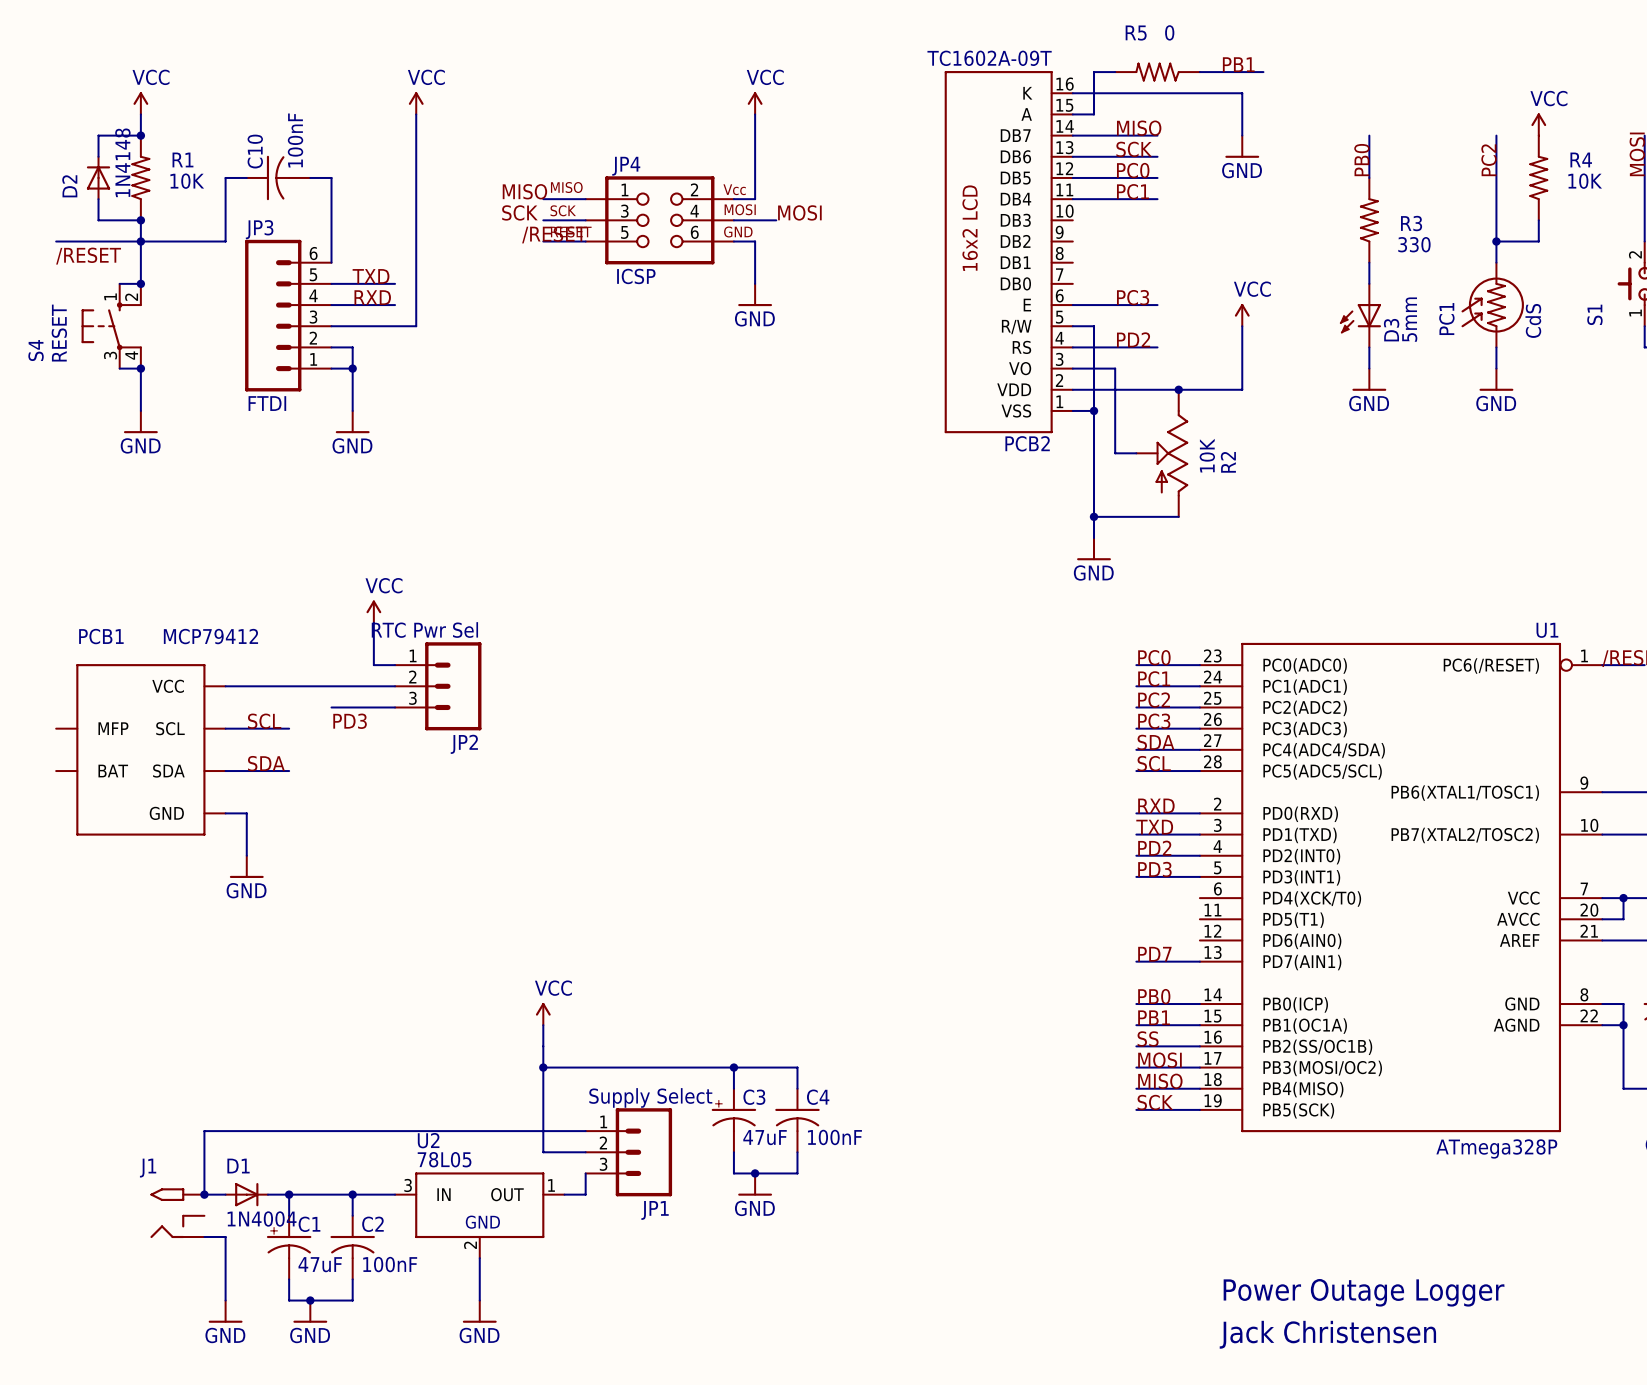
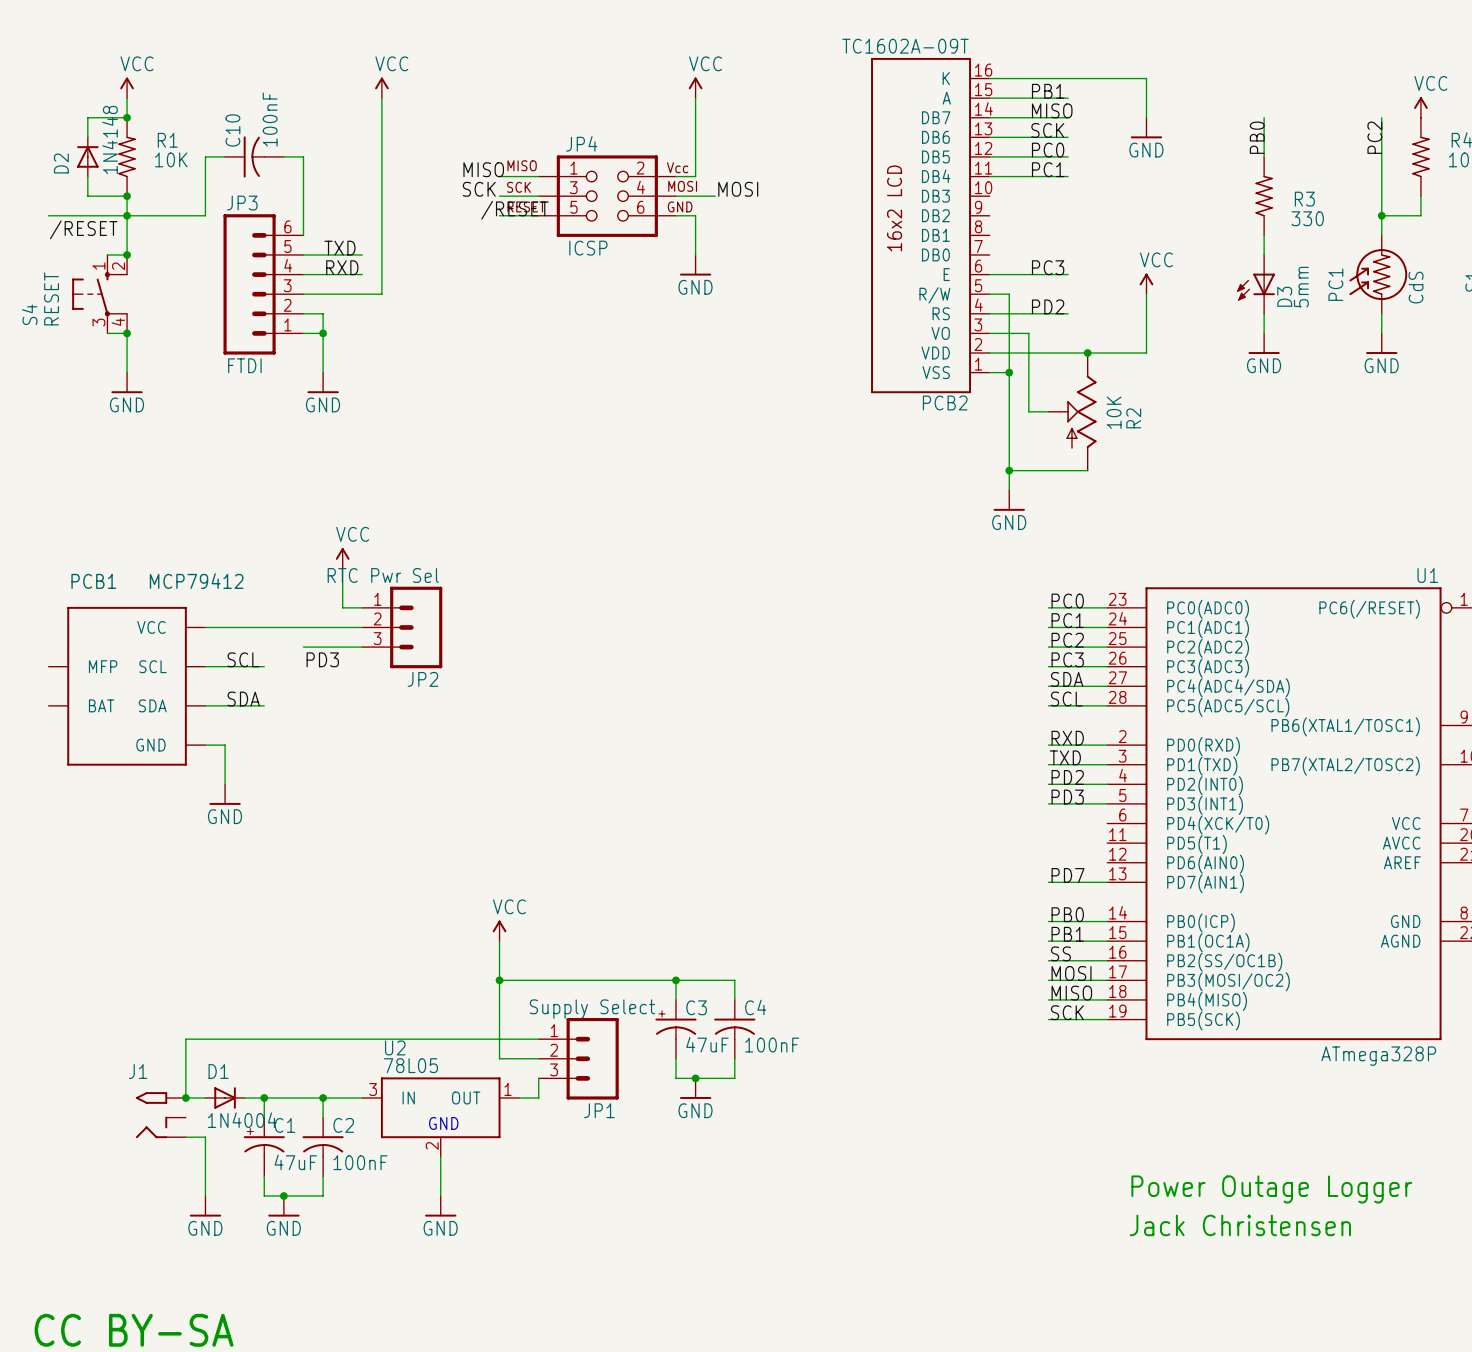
label position: PB1 (1238, 64) -> PB1 (1048, 91)
wire: (1115, 72) (1094, 72) (1094, 114) -> (1068, 98) (1009, 98)
R5: 0 (1157, 72) -> none
wire: (1199, 72) (1263, 72) -> none

